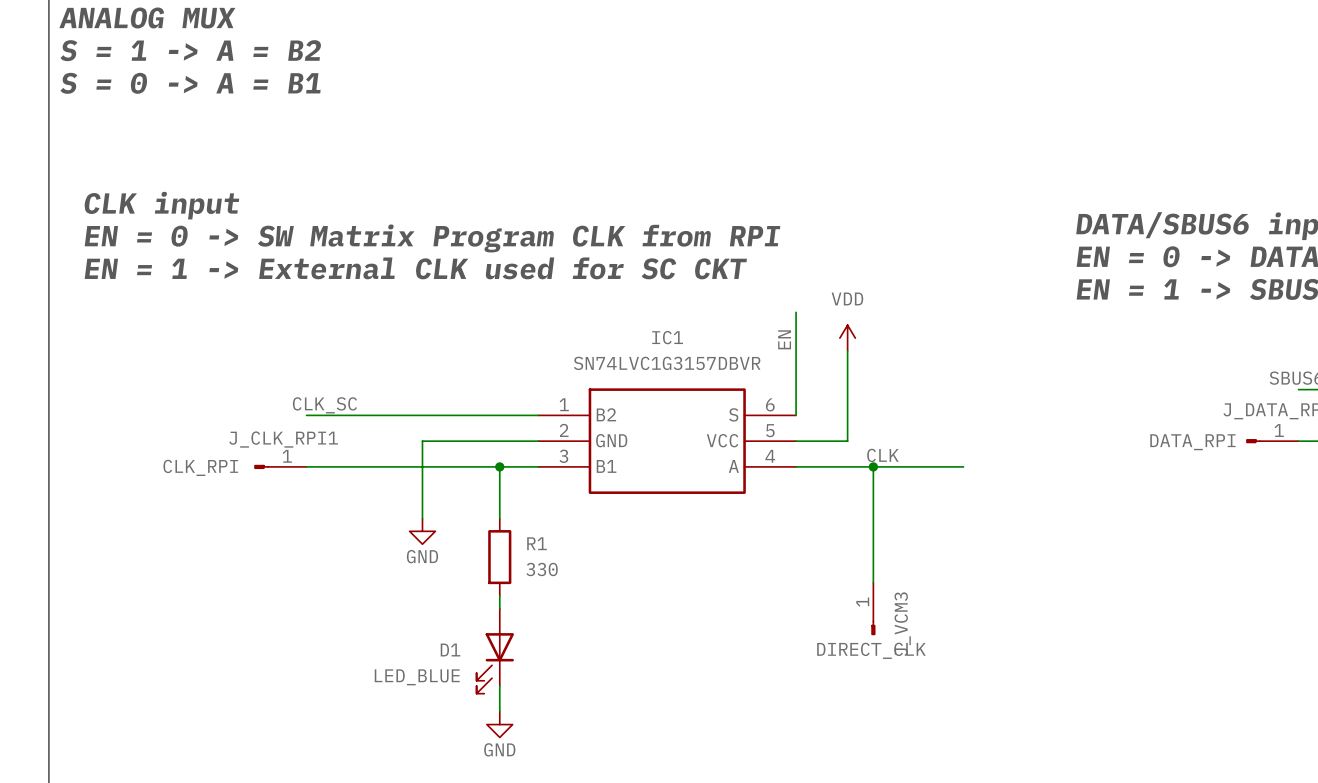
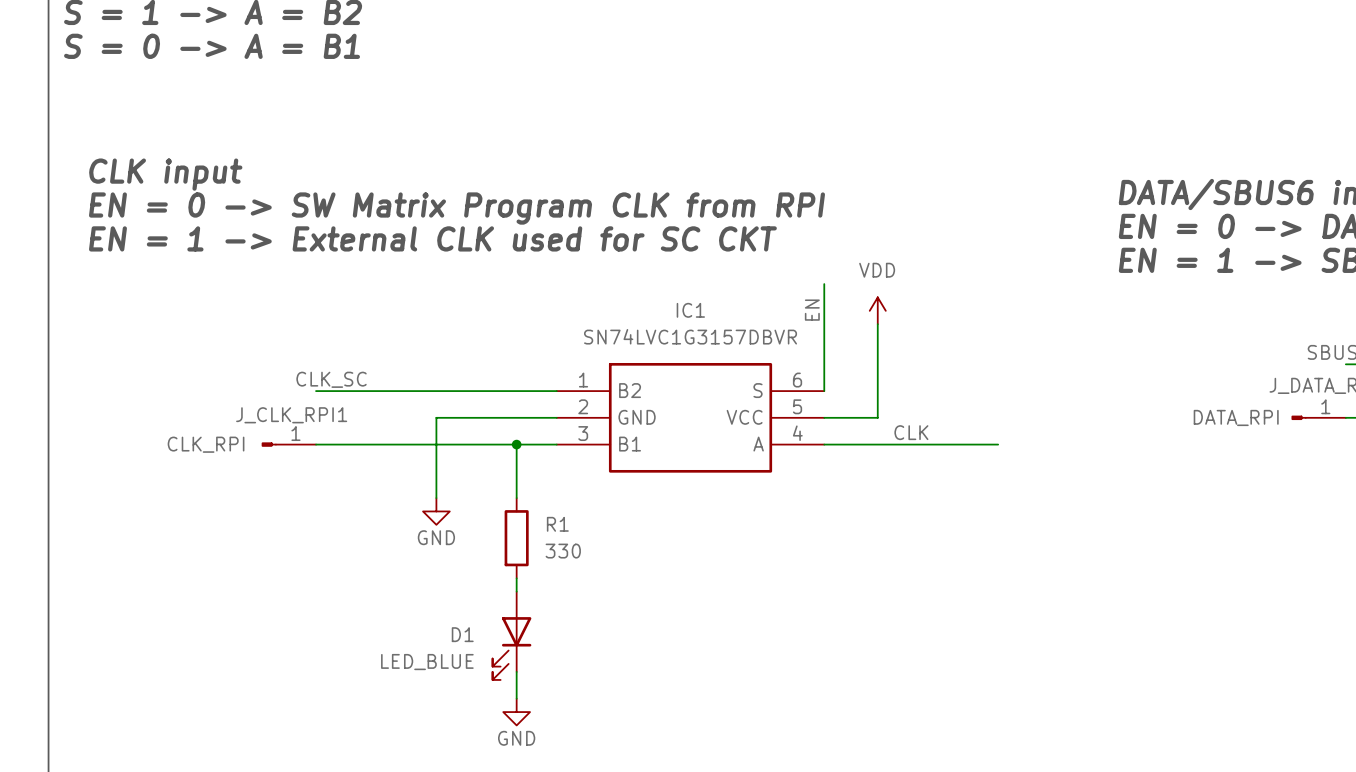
wire: (873, 466) (873, 582) -> none
junction: (873, 466) -> none
J_VCM3: DIRECT_CLK (873, 609) -> none

